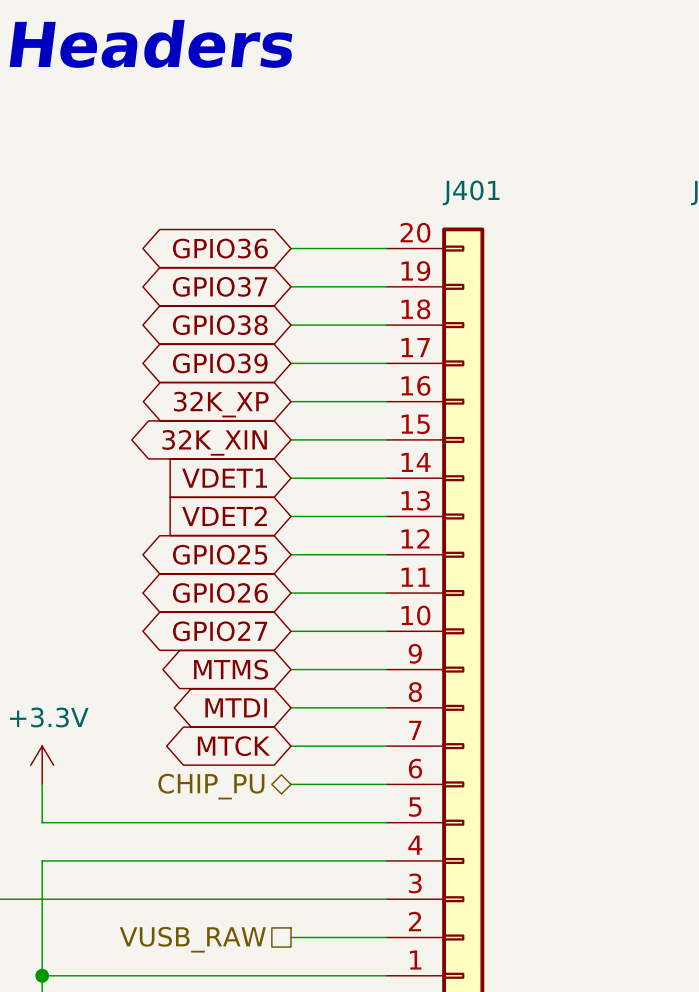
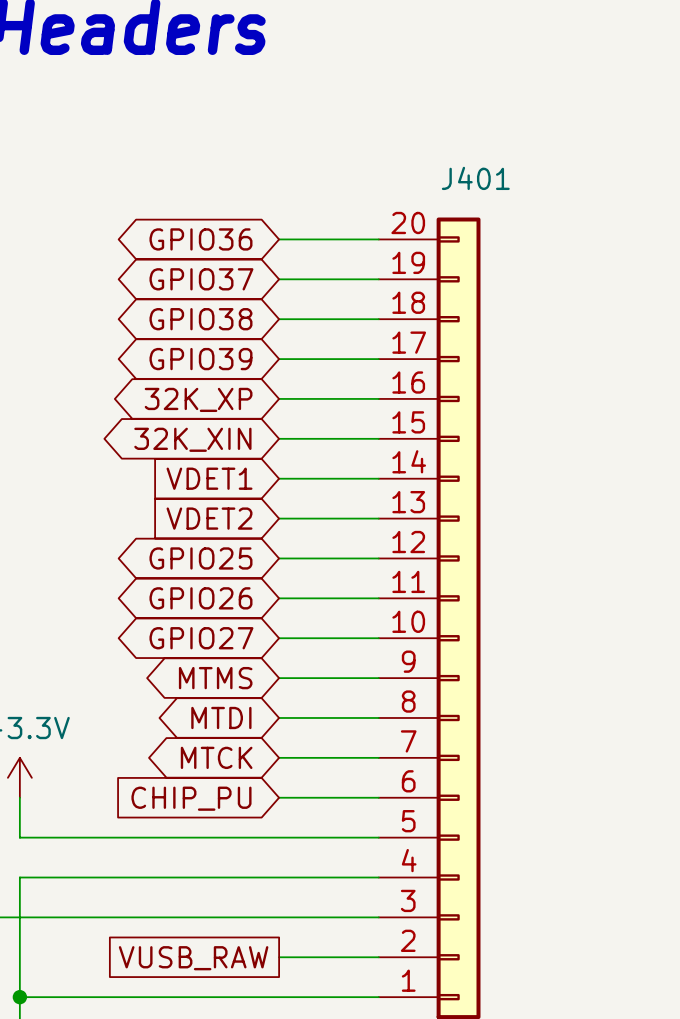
hierarchical label: CHIP_PU (211, 786) -> none
global label: none -> CHIP_PU (191, 798)
hierarchical label: VUSB_RAW (192, 939) -> none
global label: none -> VUSB_RAW (193, 958)

